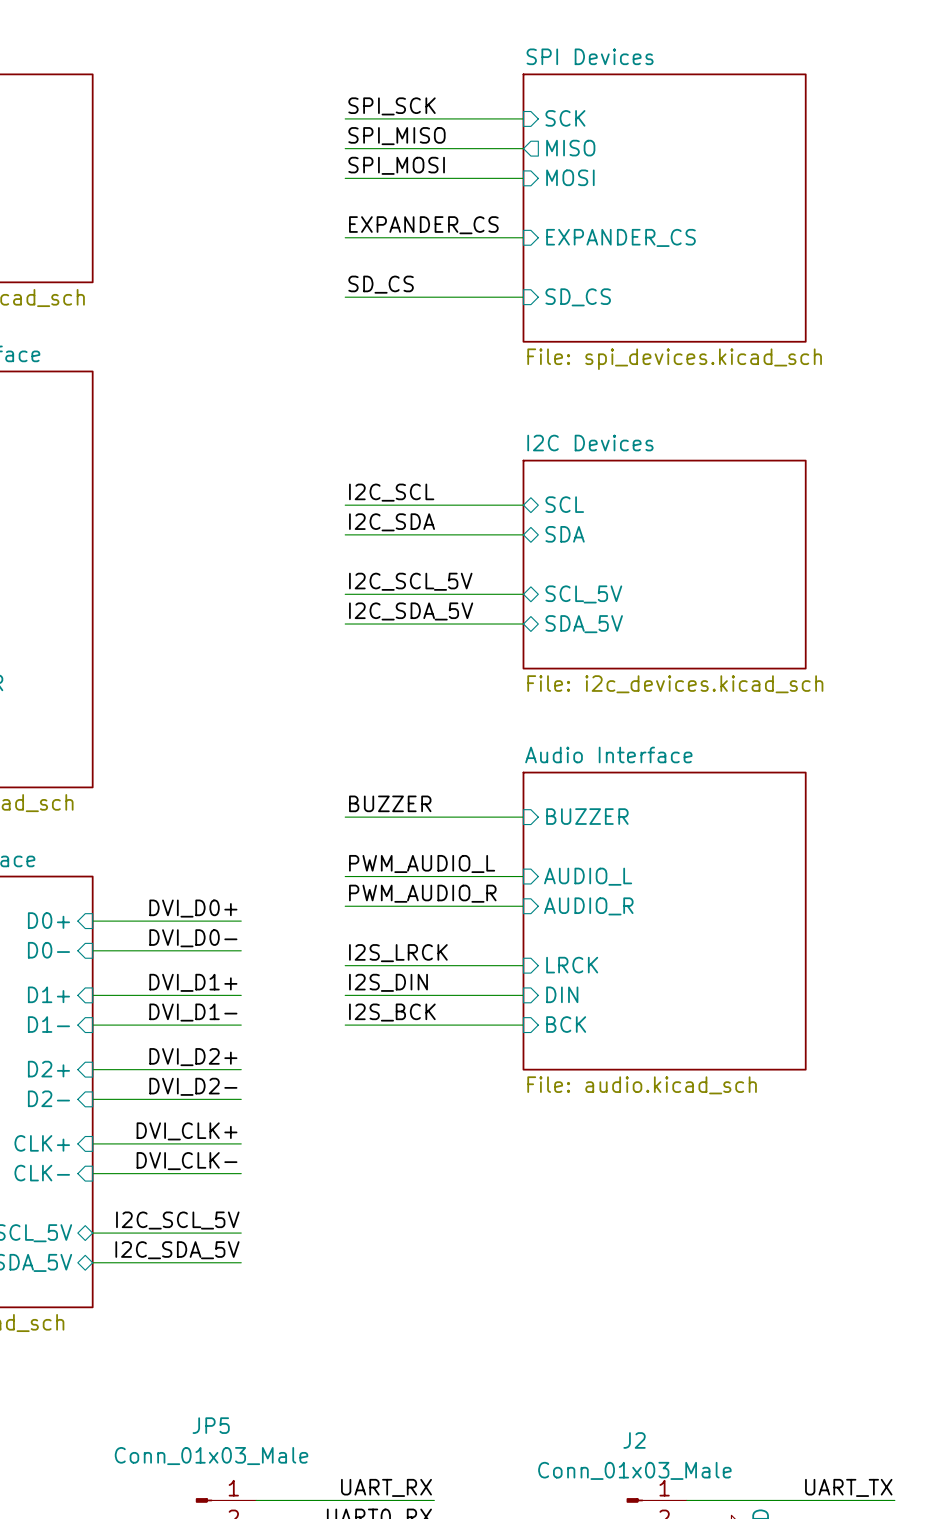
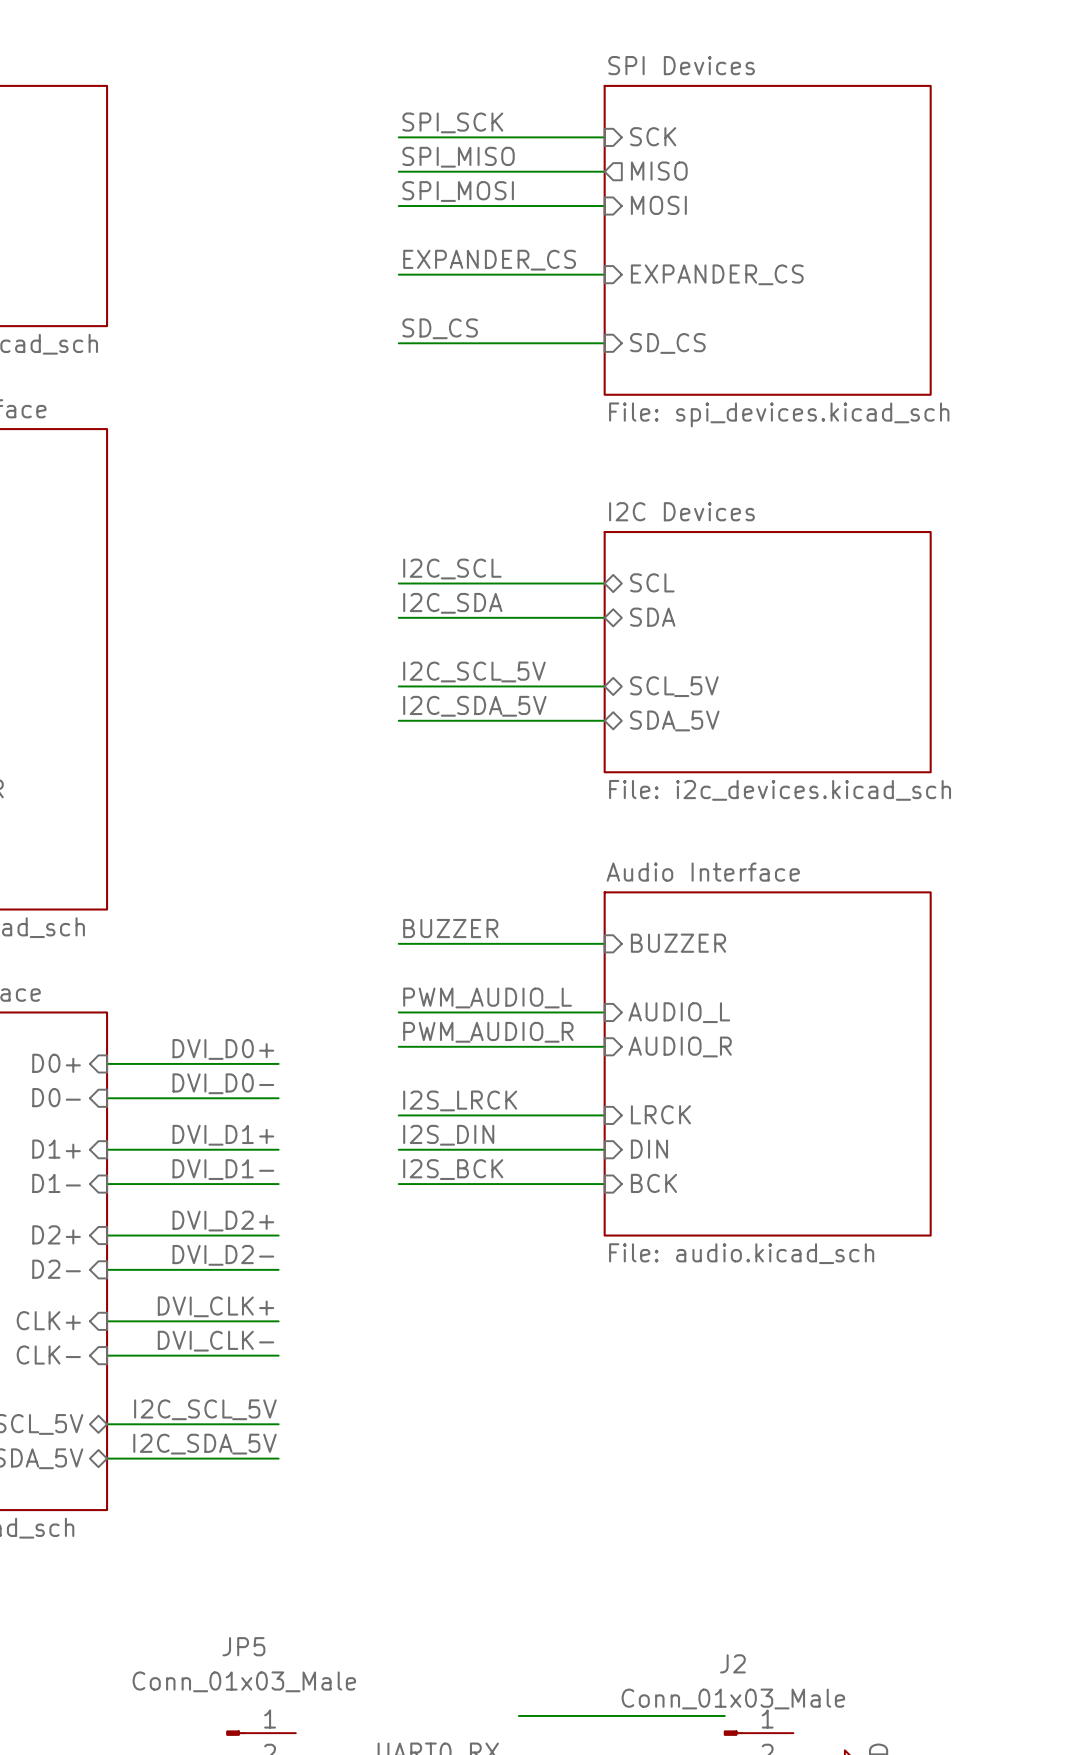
label: UART_RX (386, 1487) -> none
label: UART_TX (848, 1487) -> none
wire: (256, 1500) (434, 1500) -> (518, 1715) (724, 1715)
wire: (686, 1500) (894, 1500) -> none

